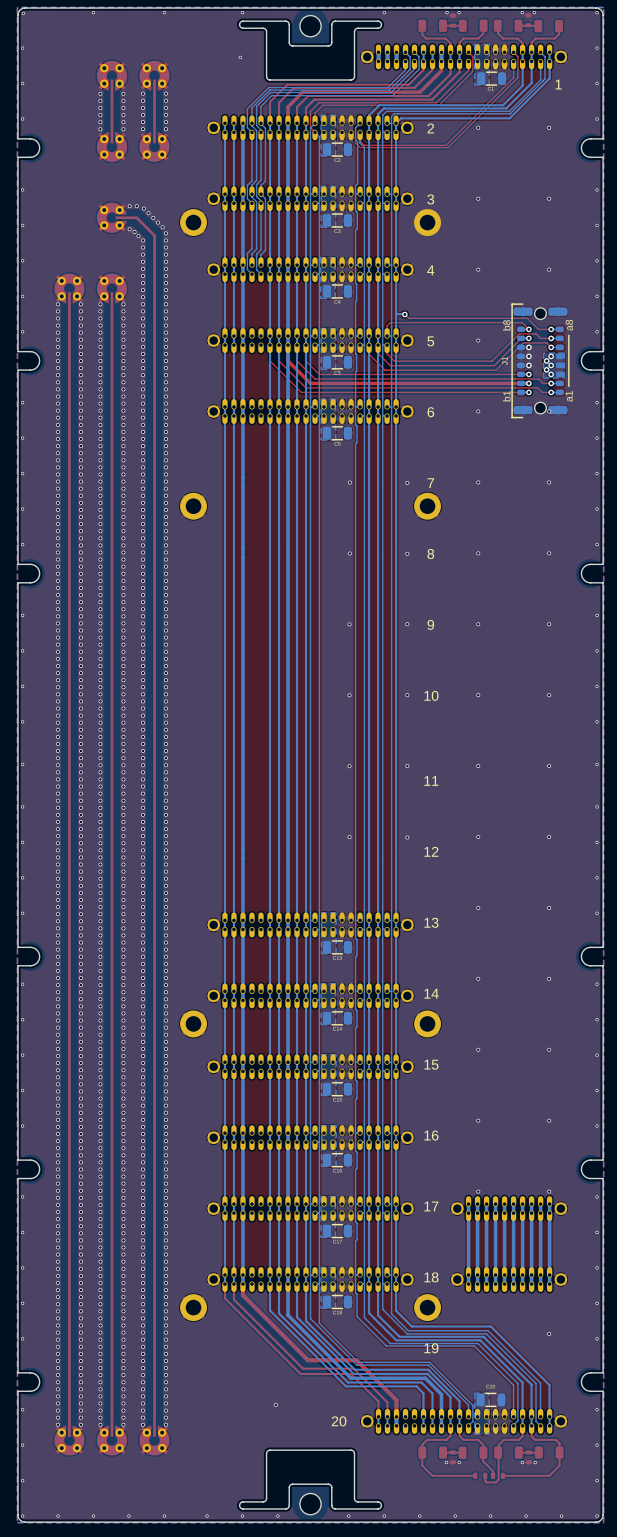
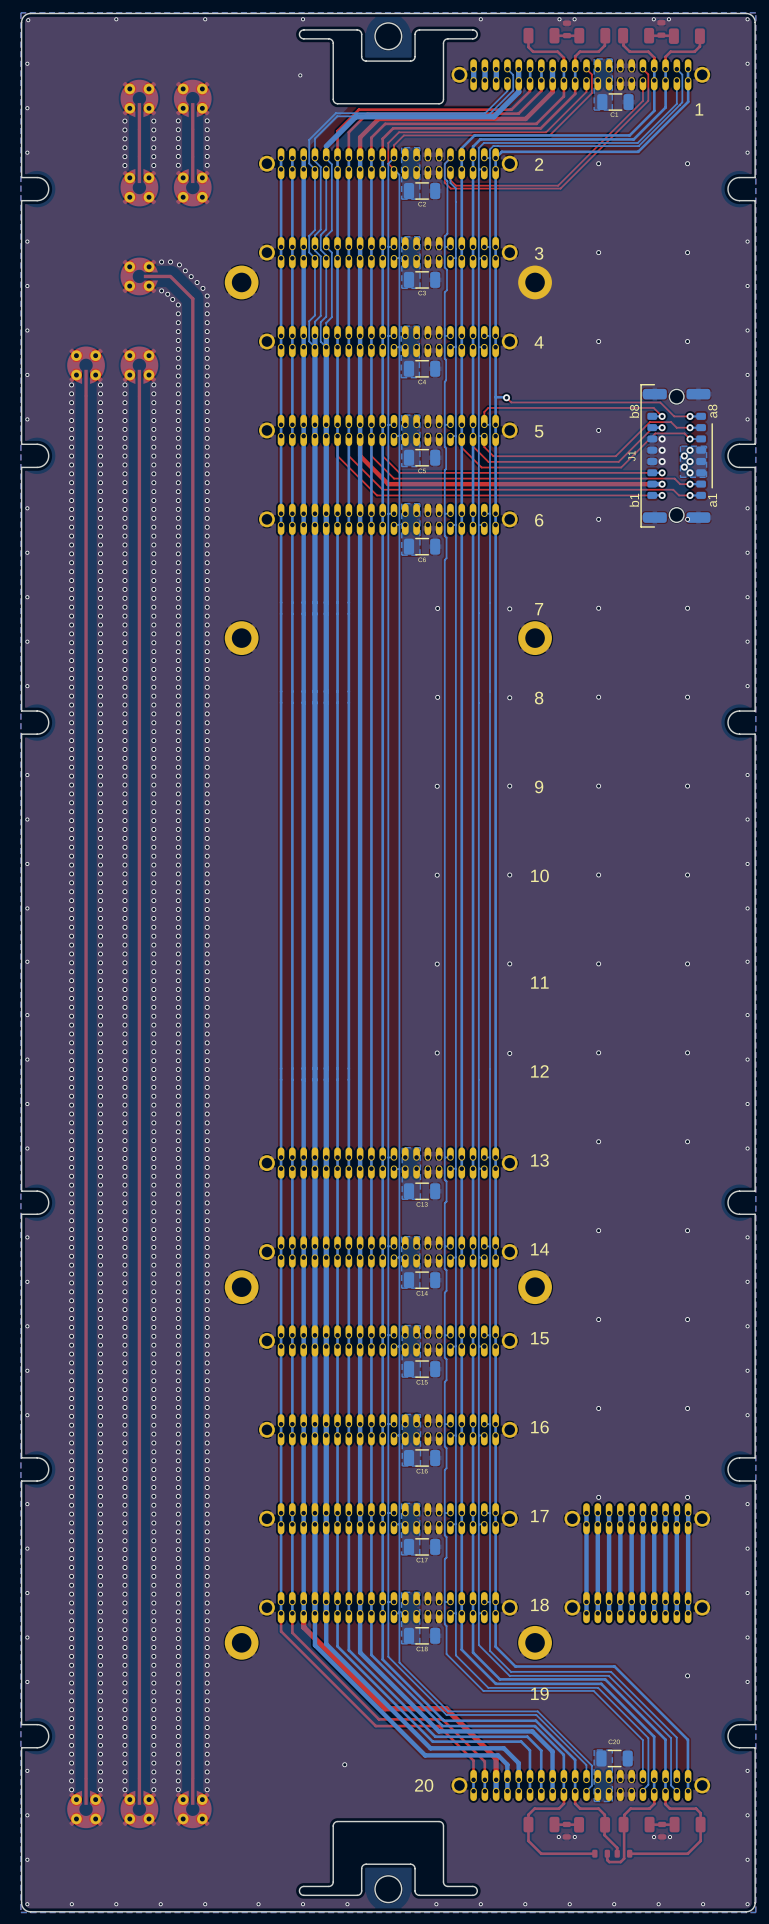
bottom track: (414, 52) (419, 56) (419, 69) (392, 95) (271, 95) (260, 106) (260, 113) -> (518, 69) (518, 80)
bottom track: (414, 68) (390, 92) (270, 92) (256, 106) (256, 125) (260, 129) -> (518, 89) (493, 116) (355, 116) (326, 146)
bottom track: none -> (314, 335) (314, 1645) (425, 1755) (498, 1755) (507, 1764) (507, 1791)
bottom track: none -> (326, 335) (326, 1644) (430, 1748) (503, 1748) (518, 1763) (518, 1791)

